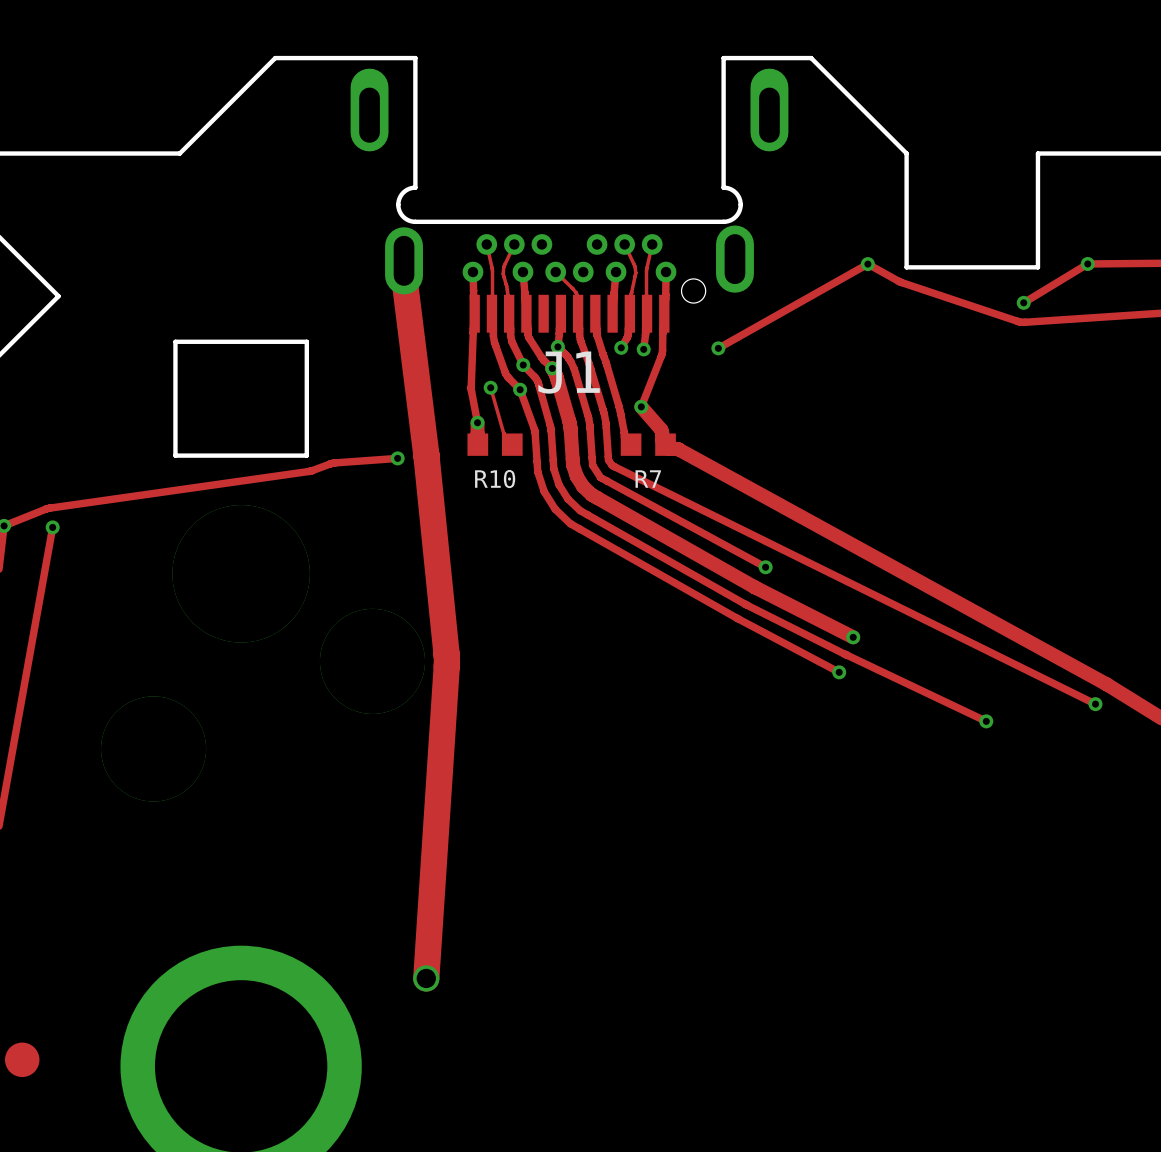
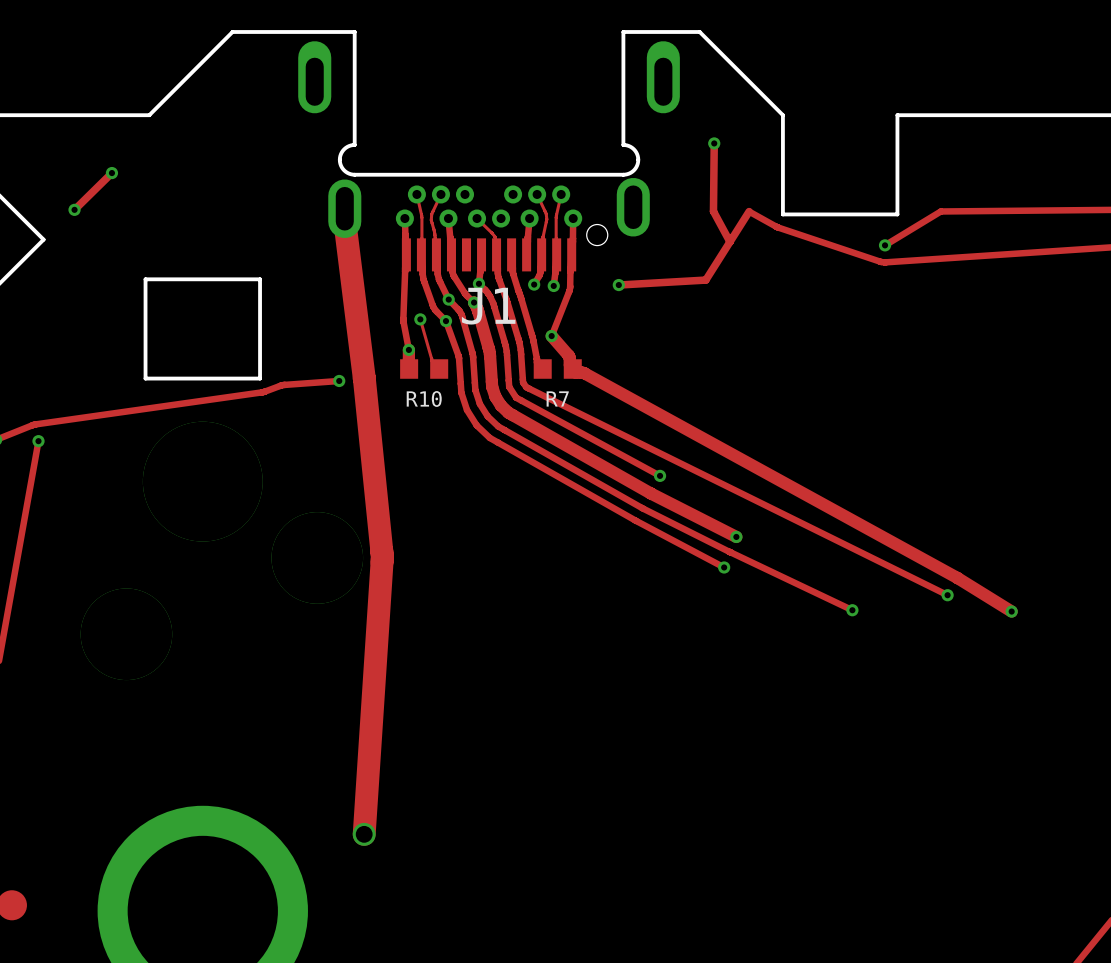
track: none -> (714, 143) (713, 211) (729, 241)
track: none -> (111, 173) (74, 209)
via: none -> (111, 173)
via: none -> (74, 209)
via: (1087, 263) -> none
track: (867, 264) (718, 348) -> (749, 211) (705, 280) (618, 285)
via position: (867, 264) -> (714, 143)

